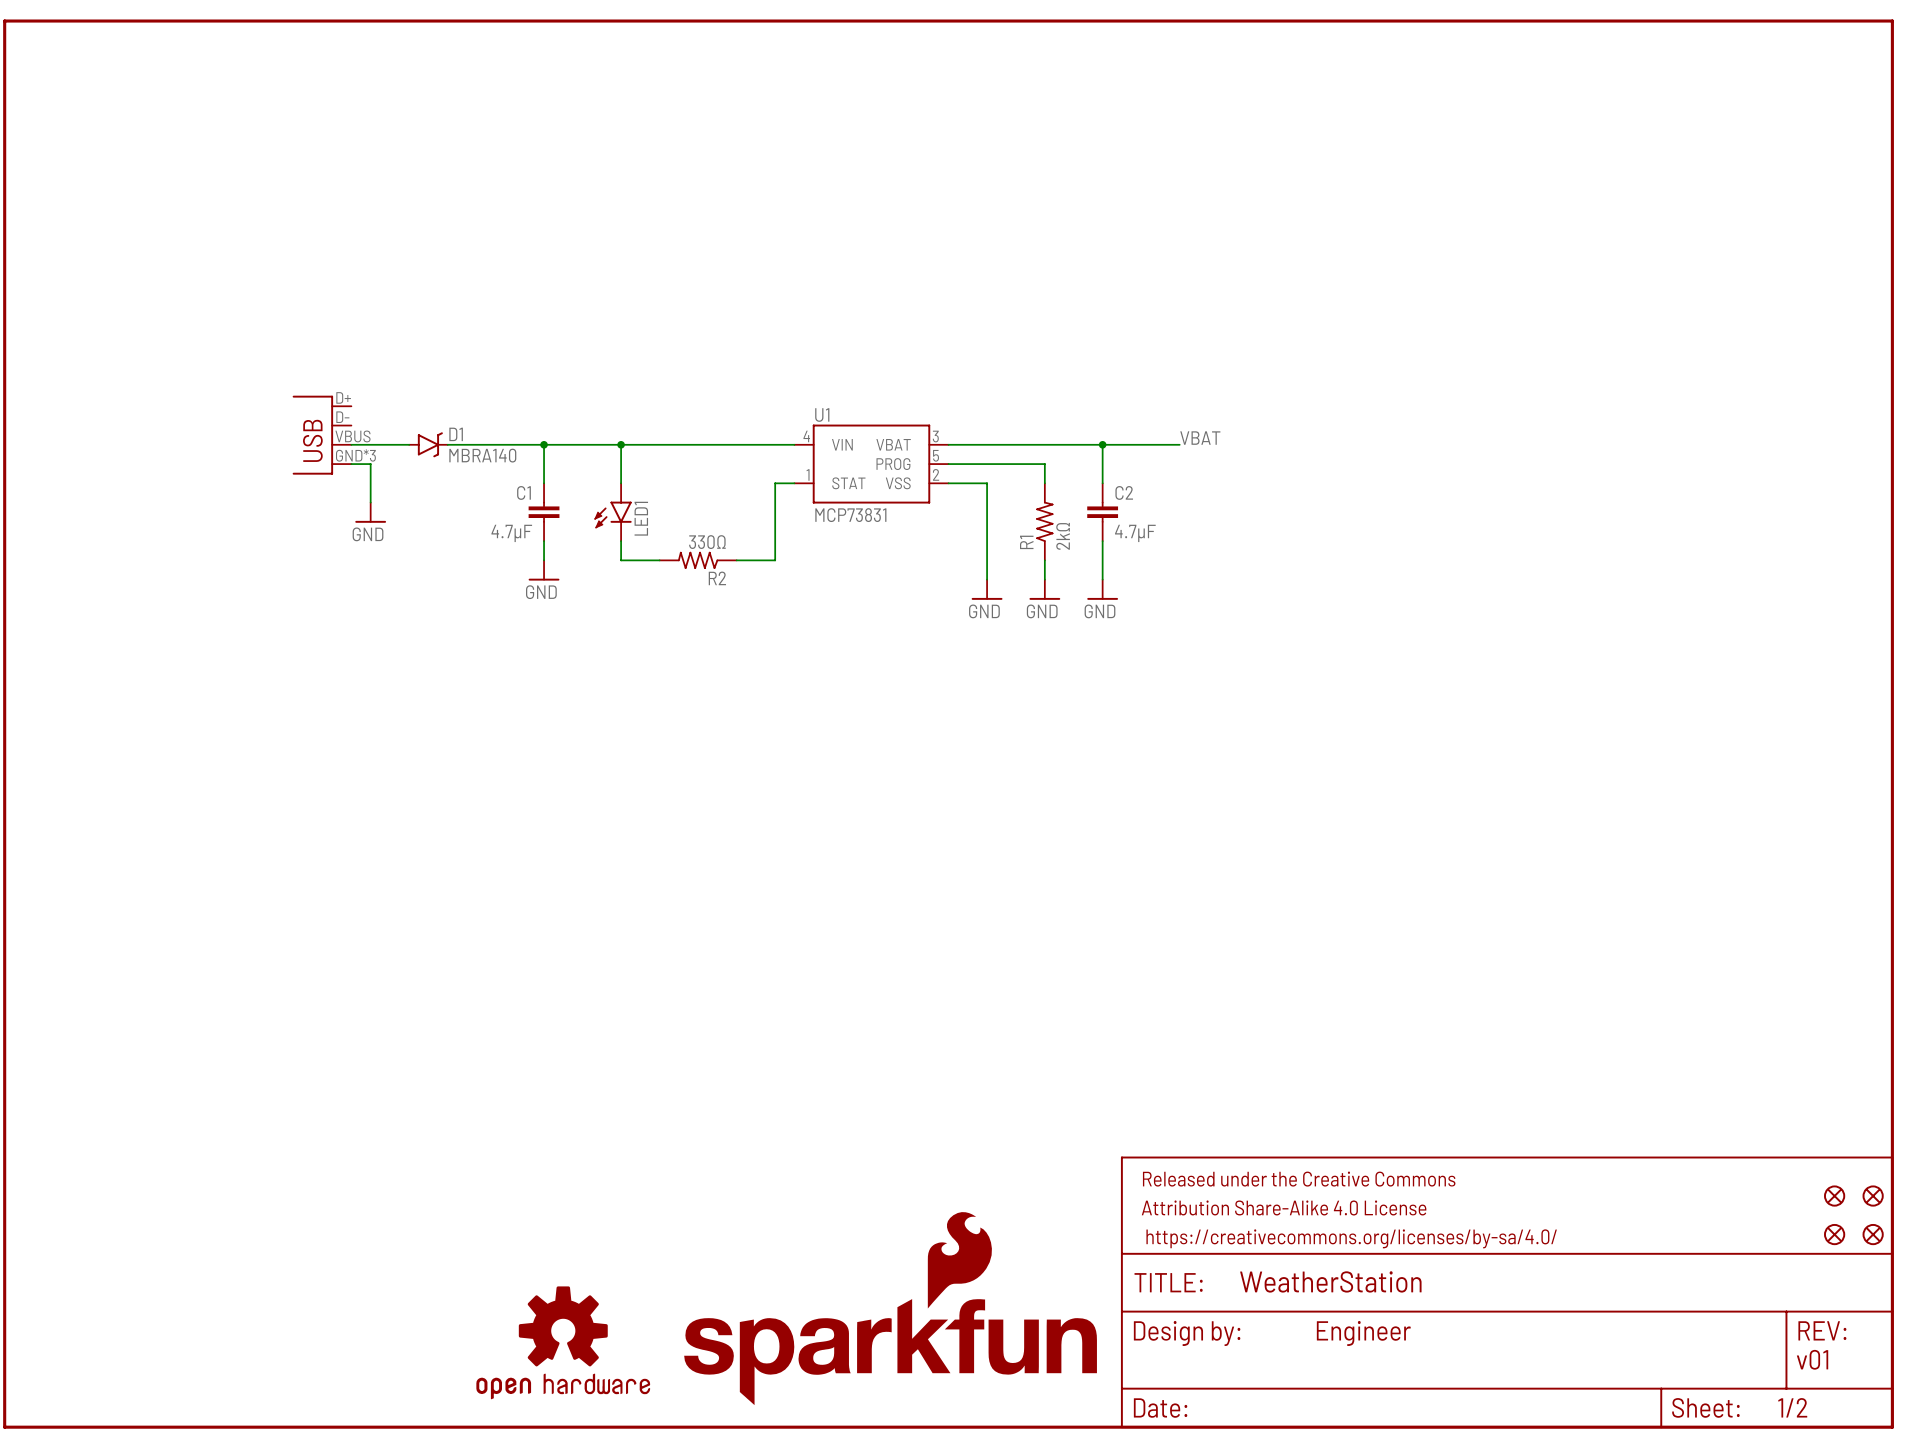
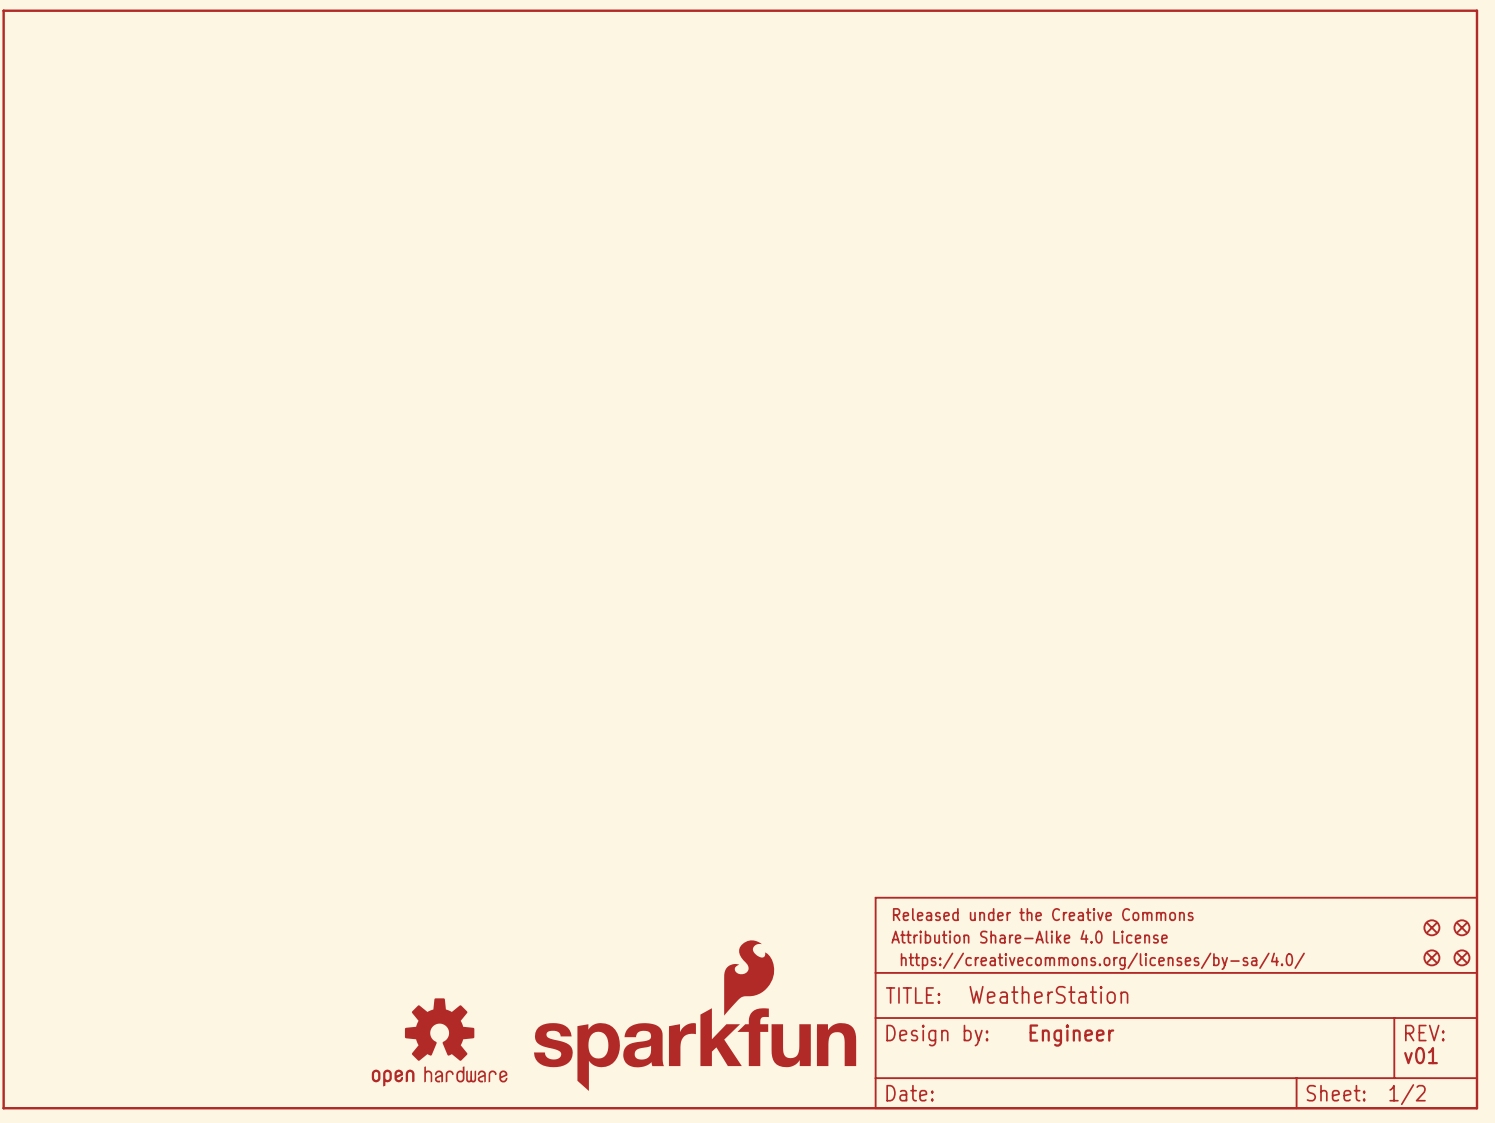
part: (322, 435) -> none
label: VBAT (1200, 438) -> none
wire: (351, 444) (409, 444) -> none
D1: MBRA140 (428, 444) -> none
wire: (447, 444) (794, 444) -> none
wire: (544, 444) (544, 483) -> none
junction: (544, 444) -> none
wire: (621, 444) (621, 483) -> none
junction: (621, 444) -> none
wire: (948, 444) (1179, 444) -> none
wire: (1102, 444) (1102, 483) -> none
junction: (1102, 444) -> none
wire: (351, 464) (370, 464) (370, 502) -> none
U1: MCP73831 (871, 464) -> none
wire: (948, 464) (1044, 464) (1044, 483) -> none
wire: (794, 483) (775, 483) (775, 560) (736, 560) -> none
wire: (948, 483) (987, 483) (987, 579) -> none
power symbol: GND (370, 512) -> none
C1: 4.7µF (544, 512) -> none
LED1: (613, 512) -> none
C2: 4.7µF (1102, 512) -> none
R1: 2kΩ (1044, 521) -> none
wire: (544, 541) (544, 560) -> none
wire: (621, 541) (621, 560) (659, 560) -> none
wire: (1102, 541) (1102, 579) -> none
R2: 330Ω (698, 560) -> none
wire: (1044, 560) (1044, 579) -> none
power symbol: GND (544, 570) -> none
power symbol: GND (987, 589) -> none
power symbol: GND (1044, 589) -> none
power symbol: GND (1102, 589) -> none

